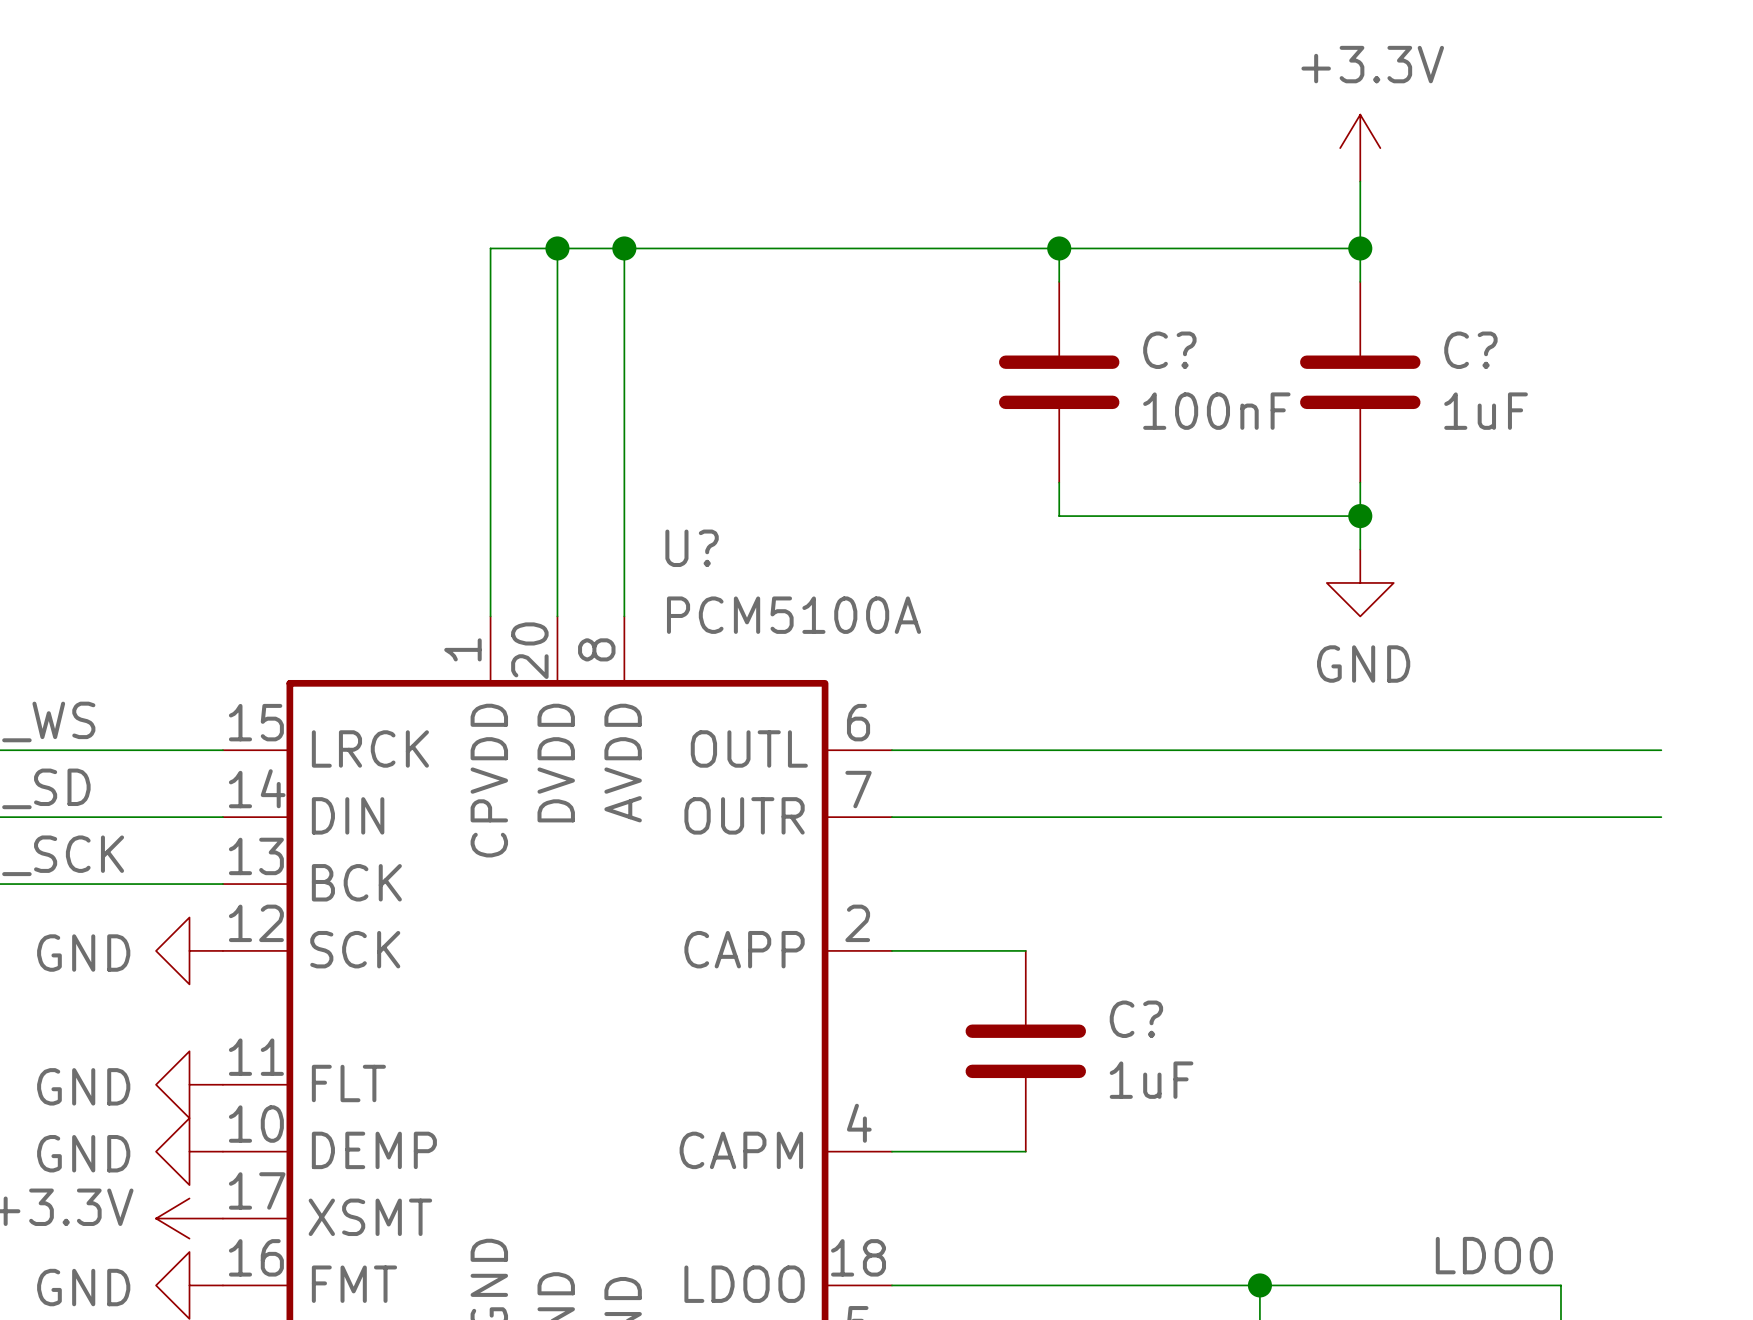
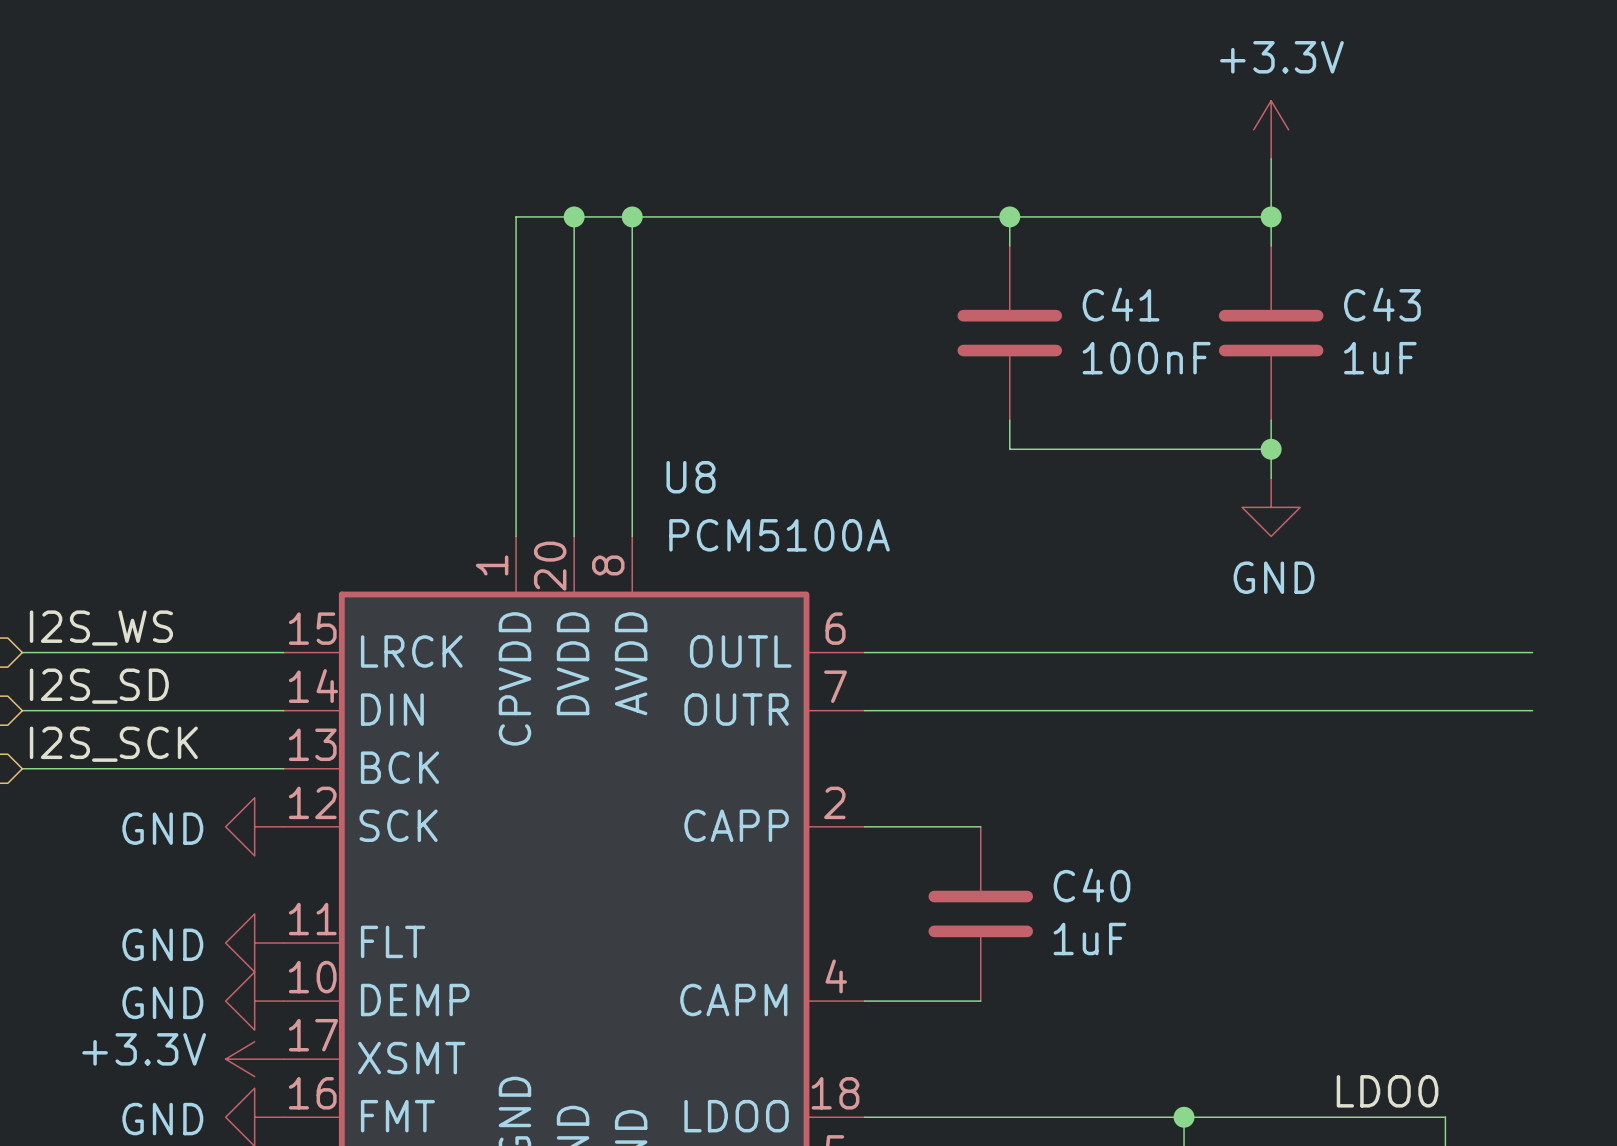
C? name: C? (1169, 350) -> C41 (1121, 304)
C? name: C? (1470, 350) -> C43 (1382, 304)
U? name: U? (692, 548) -> U8 (691, 477)
C? name: C? (1136, 1019) -> C40 (1092, 885)

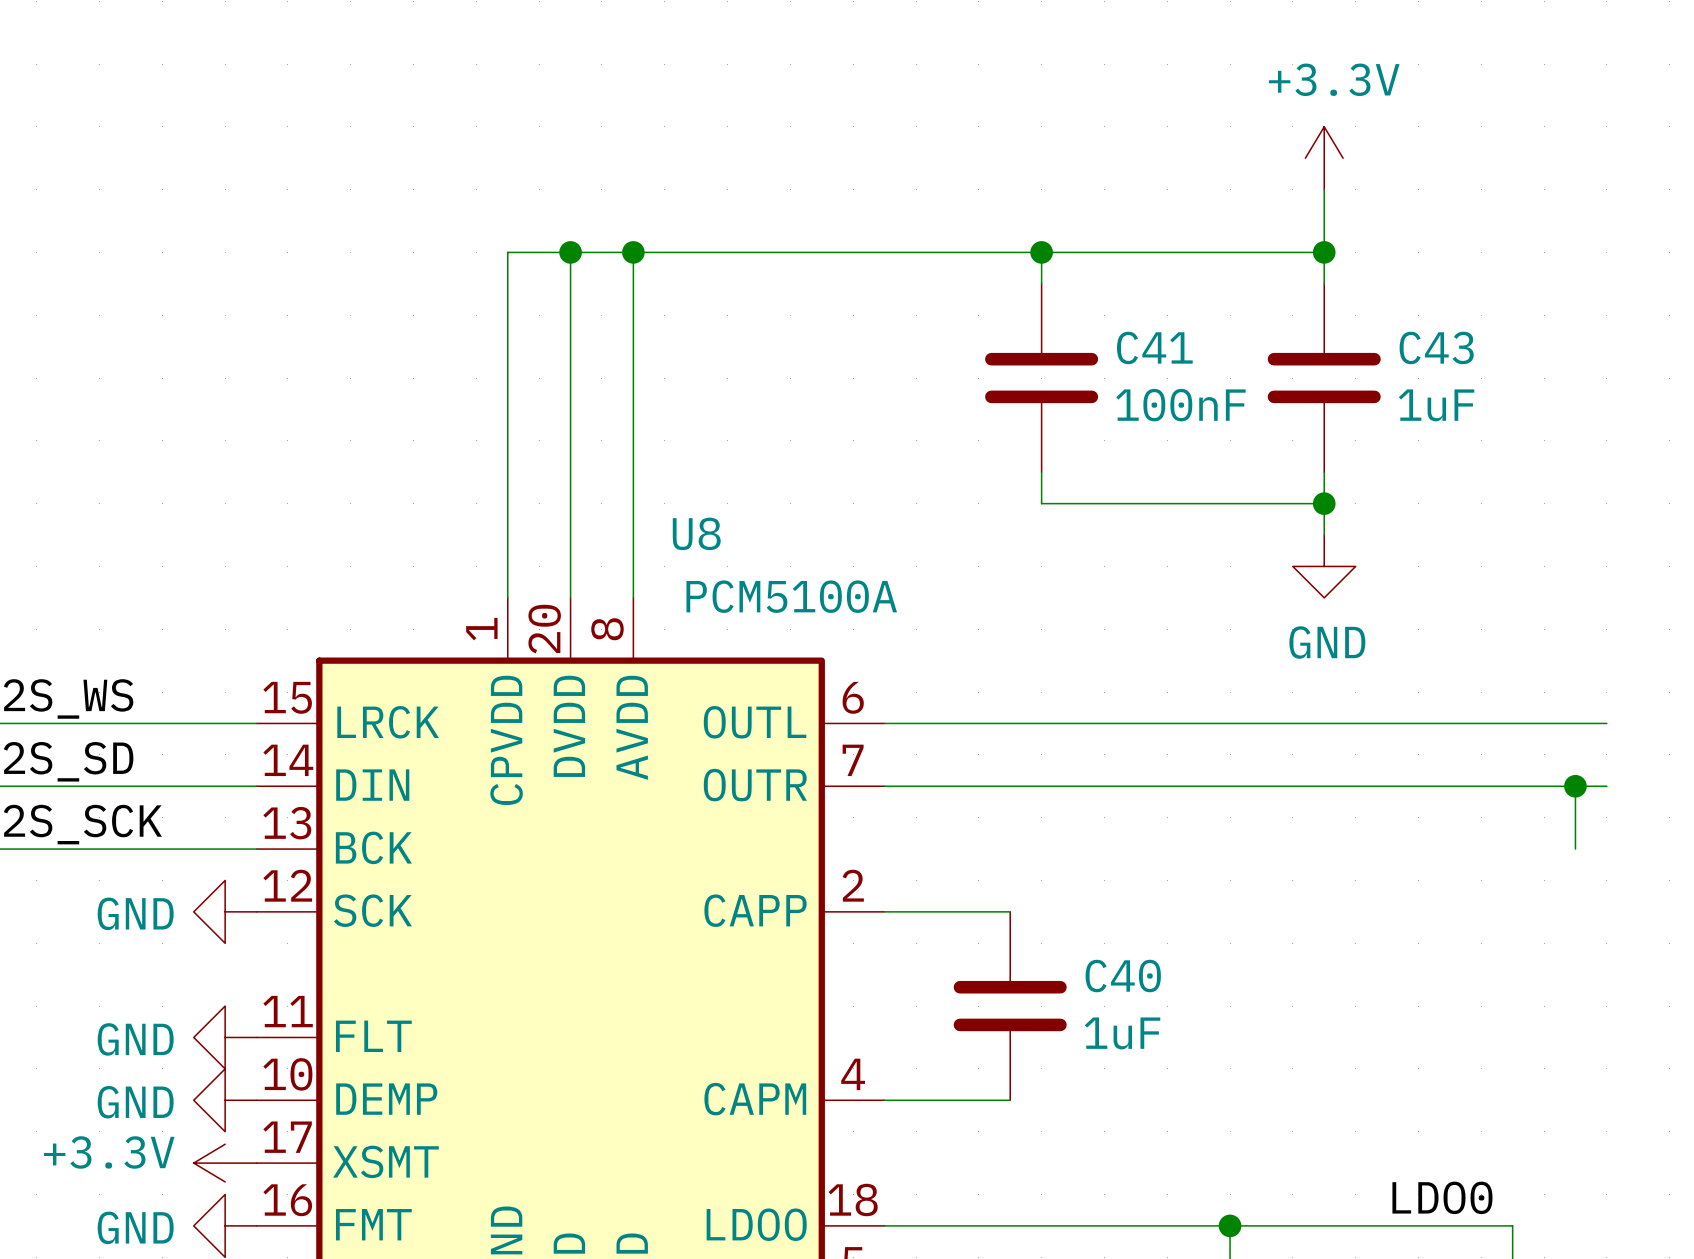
wire: none -> (1575, 786) (1575, 849)
junction: none -> (1575, 786)

